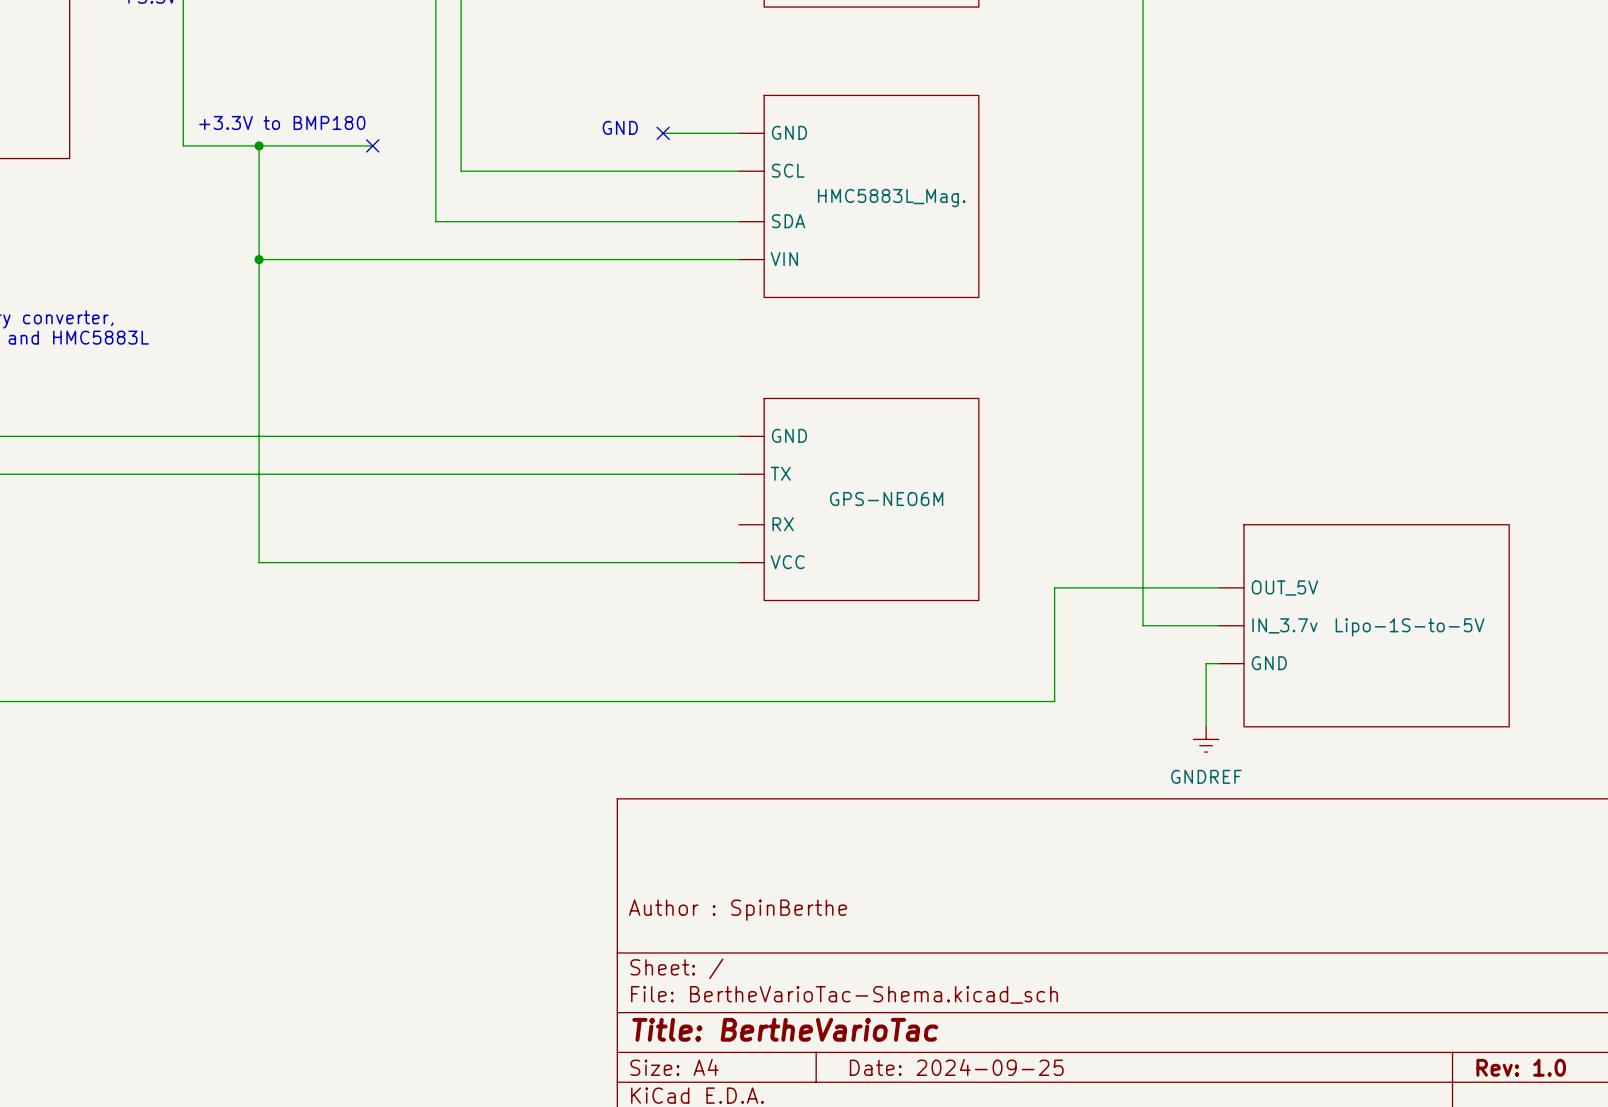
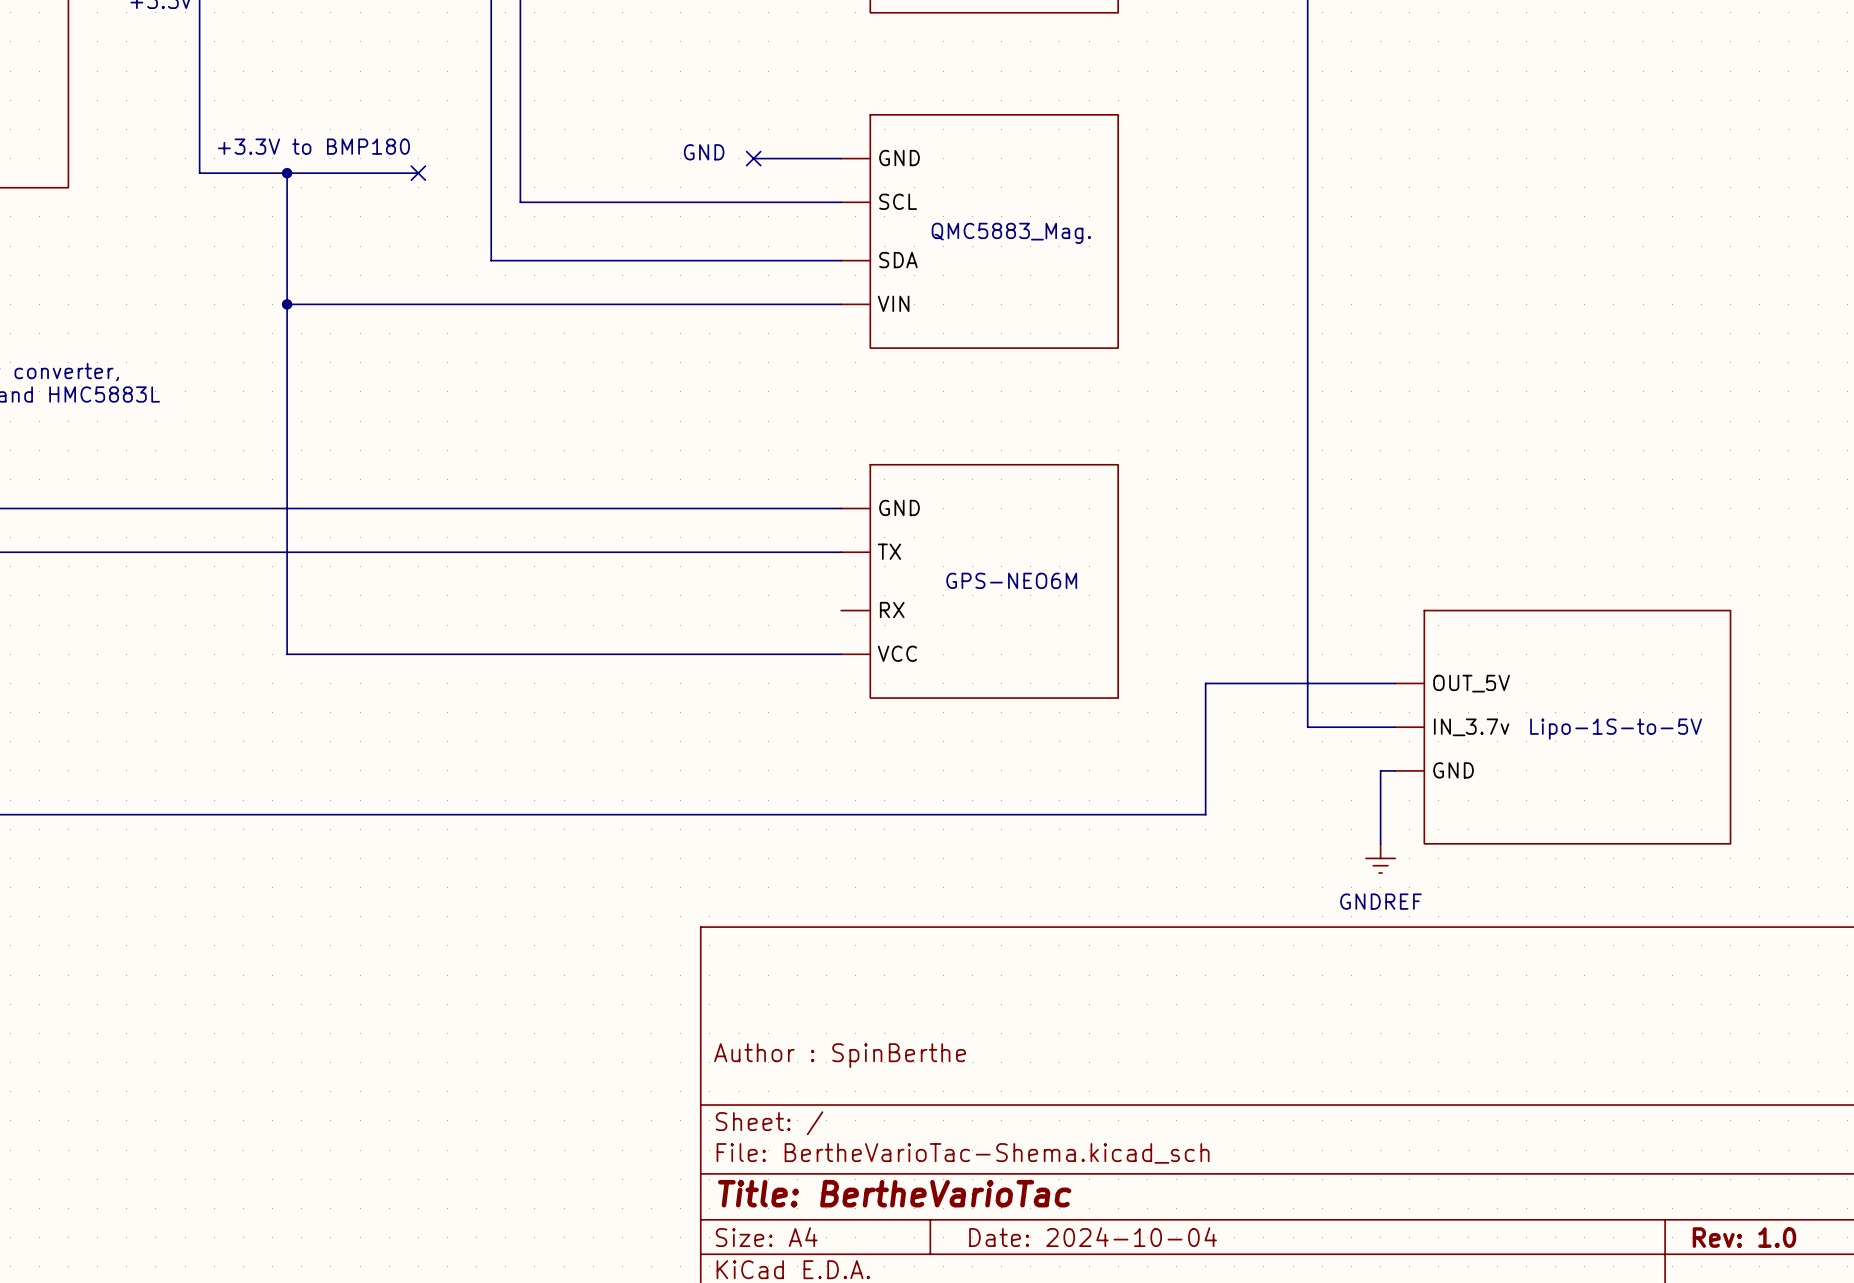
HMC5883L_Mag. name: HMC5883L_Mag. (891, 198) -> QMC5883_Mag. (1011, 233)
title block: Date: 2024-09-25 (956, 1067) -> Date: 2024-10-04 (1093, 1237)

